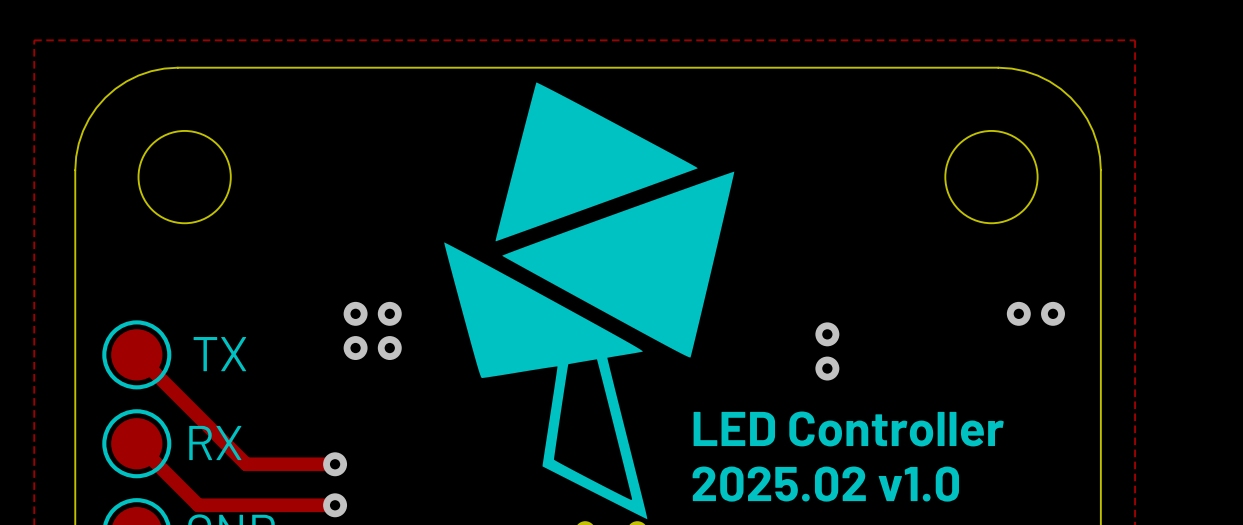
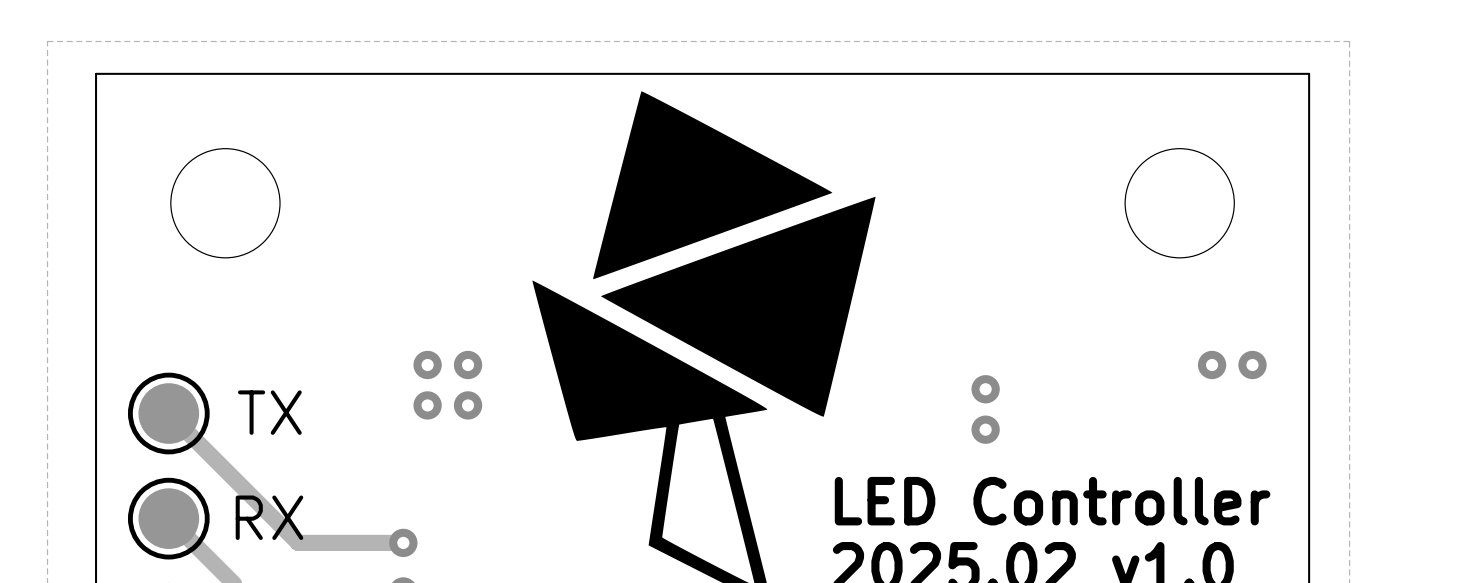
board edge: (177, 67) (151, 71) (138, 75) (126, 81) (105, 97) (89, 118) (83, 131) (78, 143) (75, 170) -> (217, 73) (96, 73) (96, 195)
board edge: (998, 67) (1024, 71) (1037, 75) (1060, 88) (1070, 97) (1087, 118) (1093, 131) (1097, 143) (1100, 170) -> (1187, 73) (1309, 73) (1309, 195)

